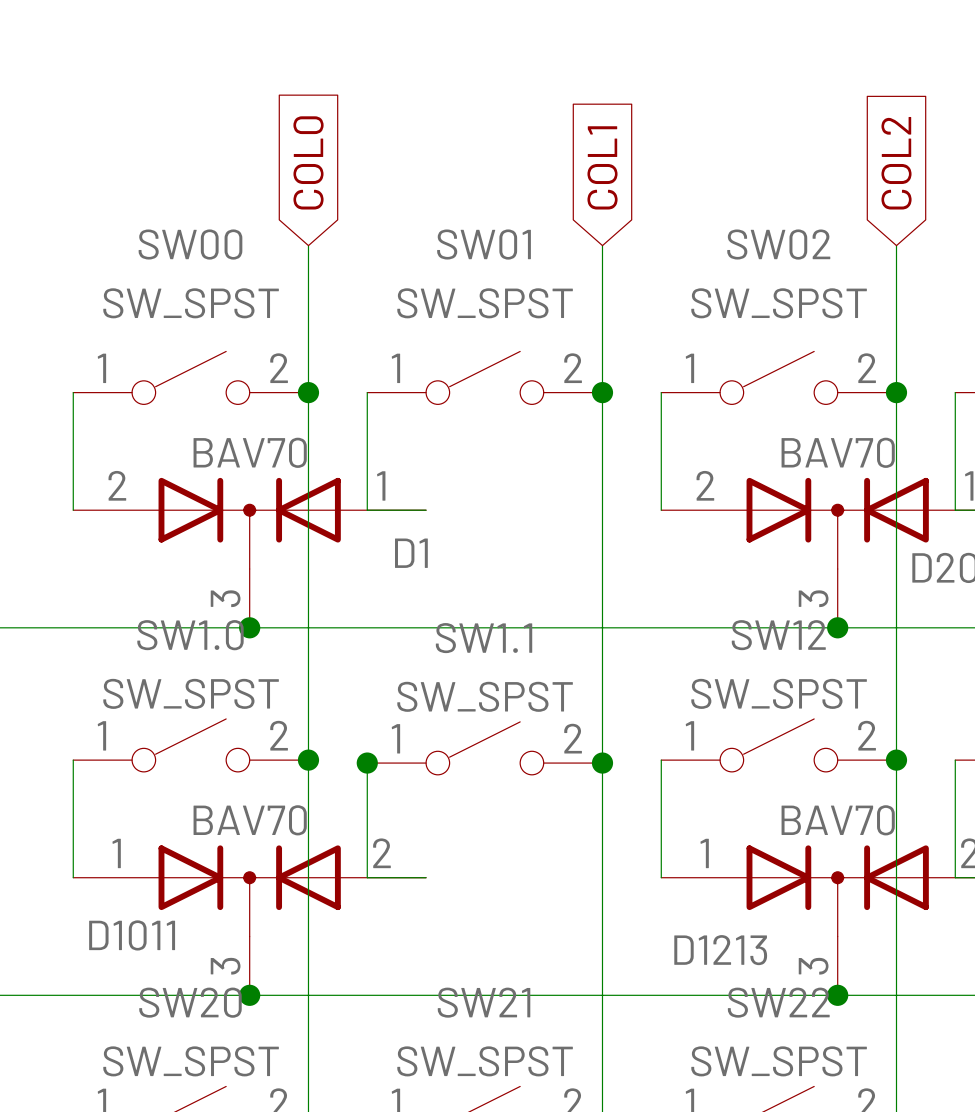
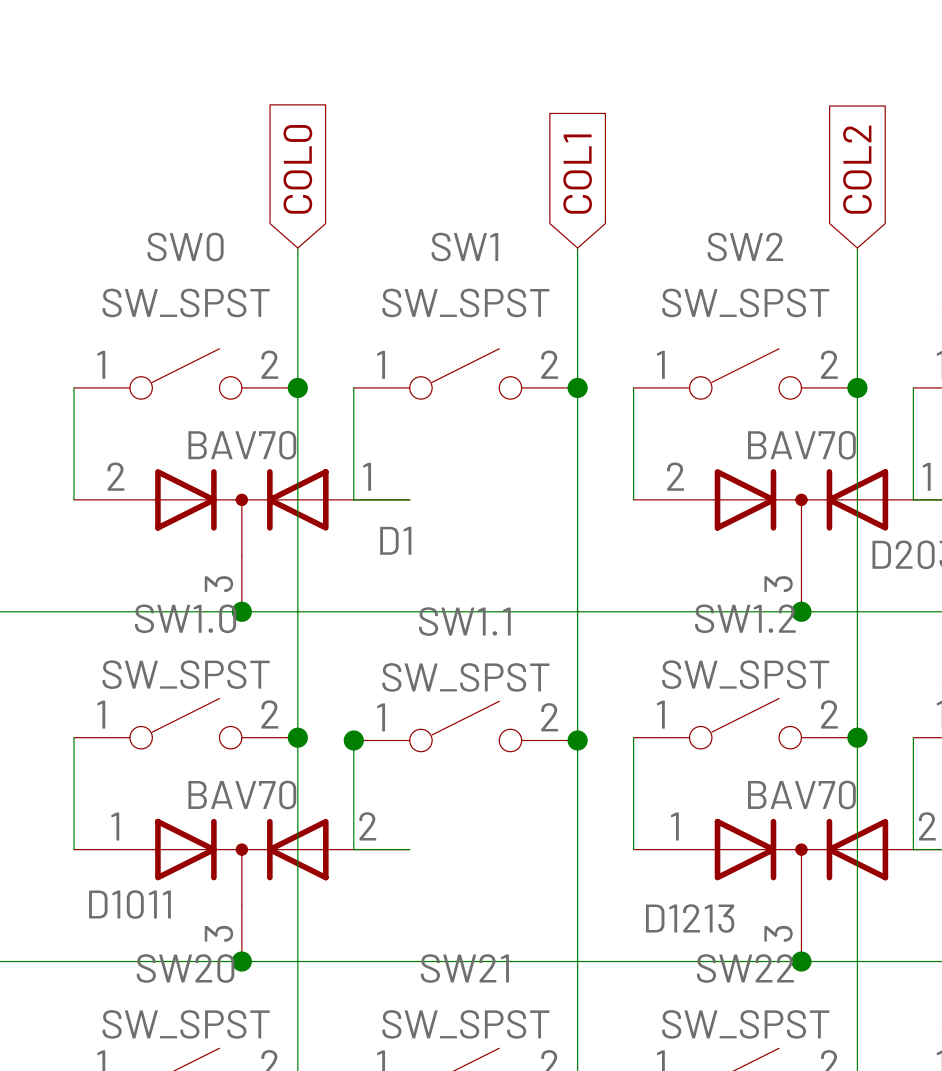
SW00 name: SW00 (190, 244) -> SW0 (185, 247)
SW01 name: SW01 (484, 244) -> SW1 (464, 247)
SW02 name: SW02 (778, 244) -> SW2 (745, 247)
SW12 name: SW12 (778, 635) -> SW1.2 (745, 618)

